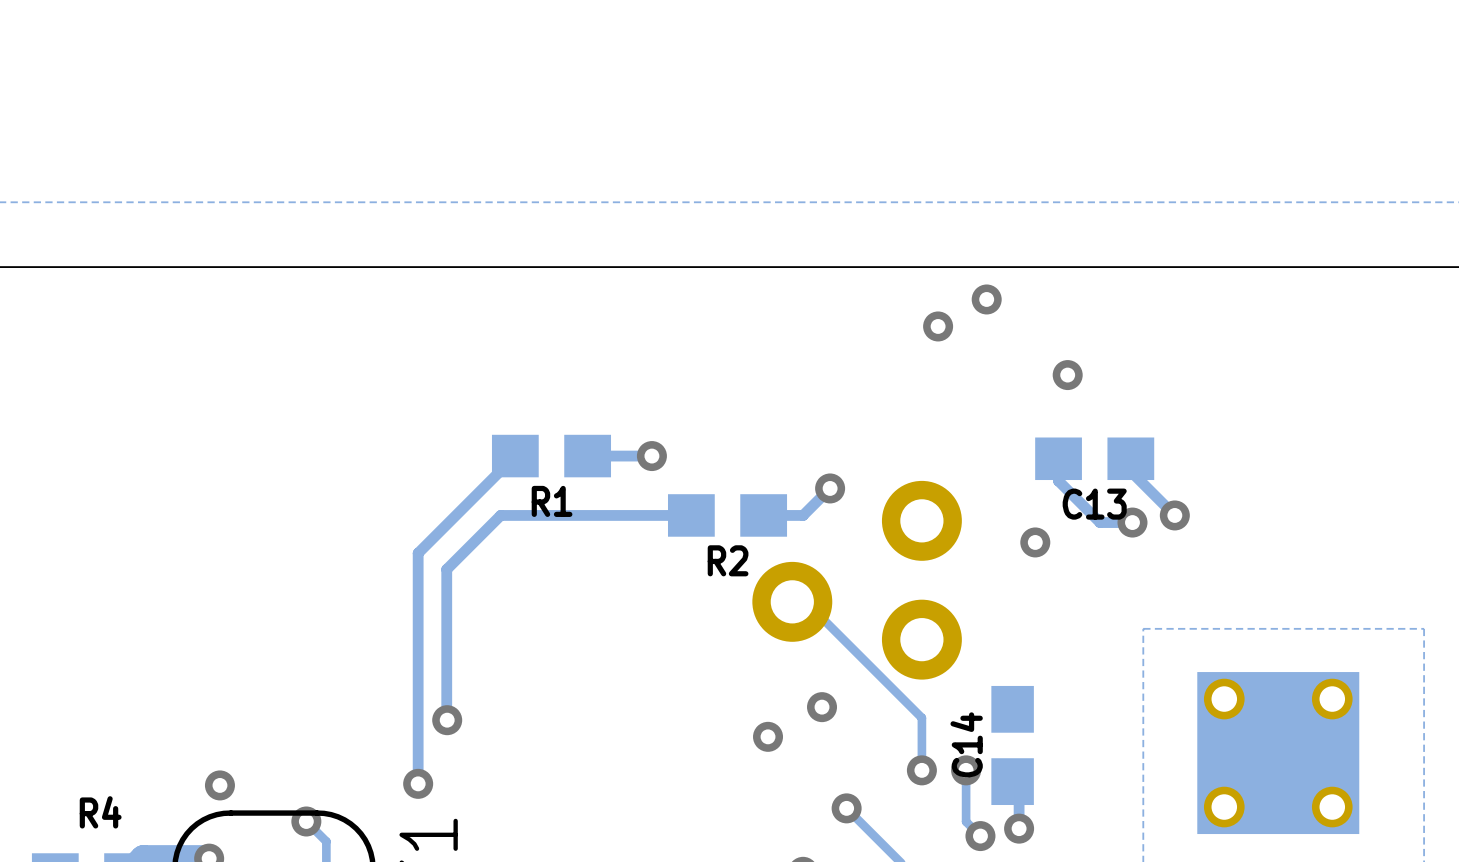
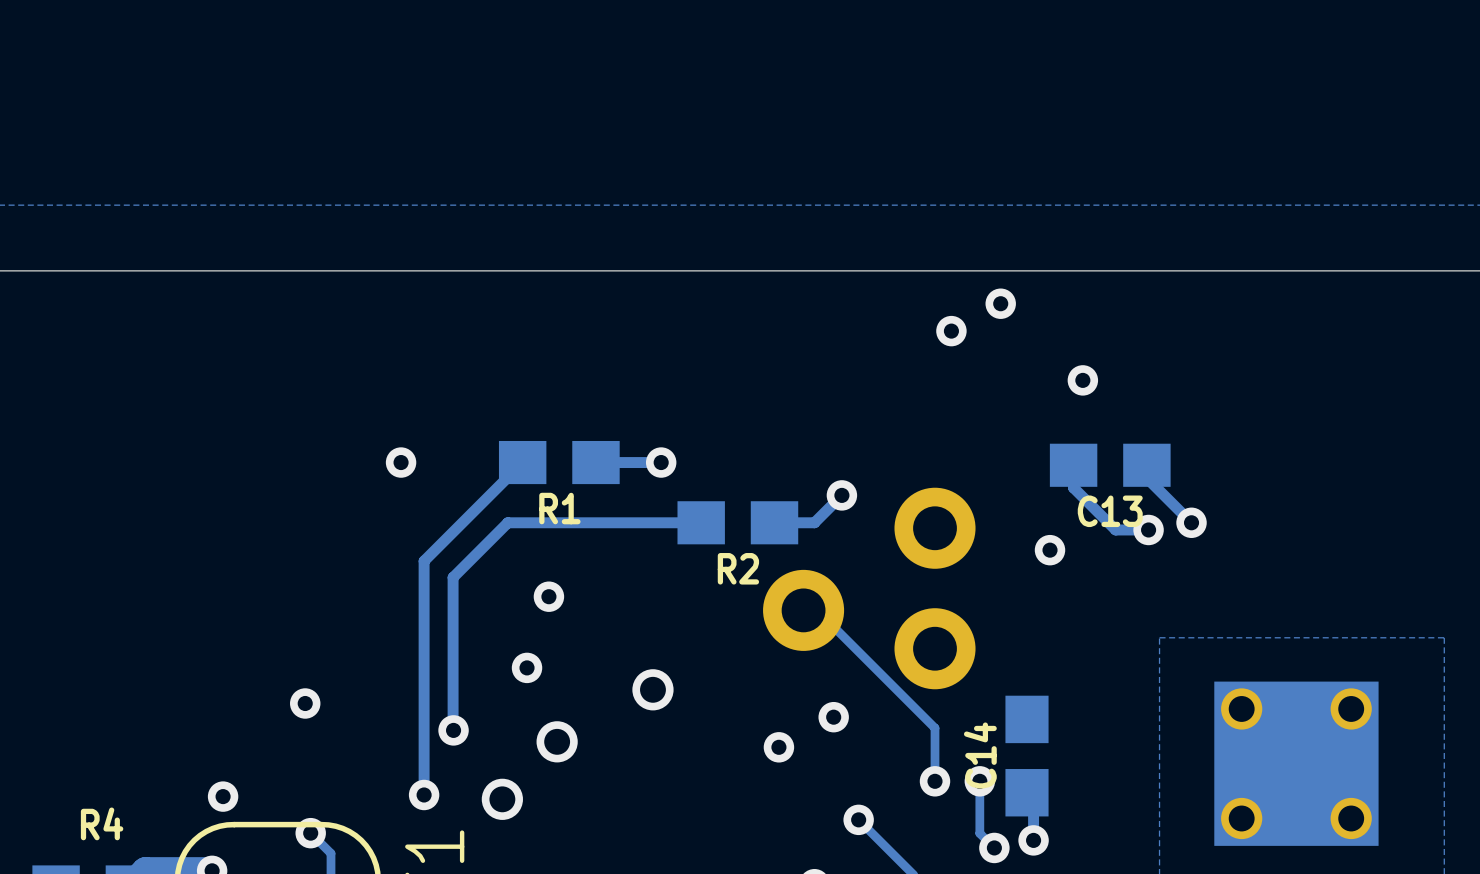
via: none -> (401, 462)
via: none -> (548, 596)
via: none -> (527, 667)
via: none -> (652, 689)
via: none -> (305, 703)
via: none -> (557, 741)
via: none -> (502, 799)

